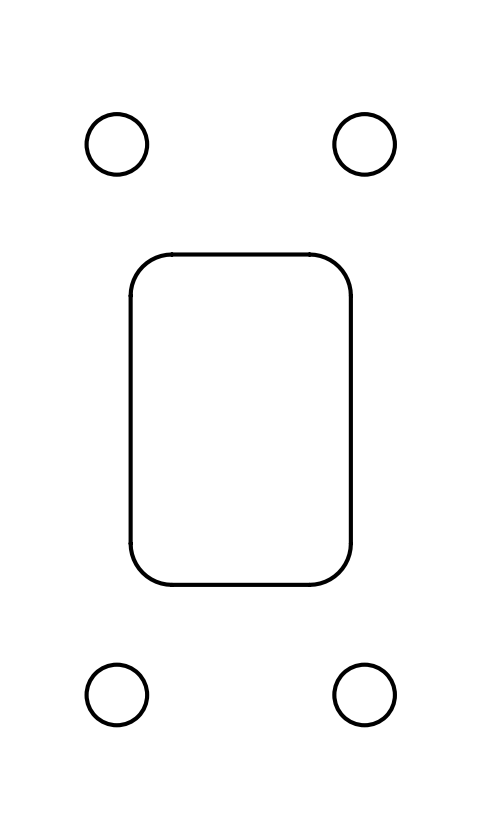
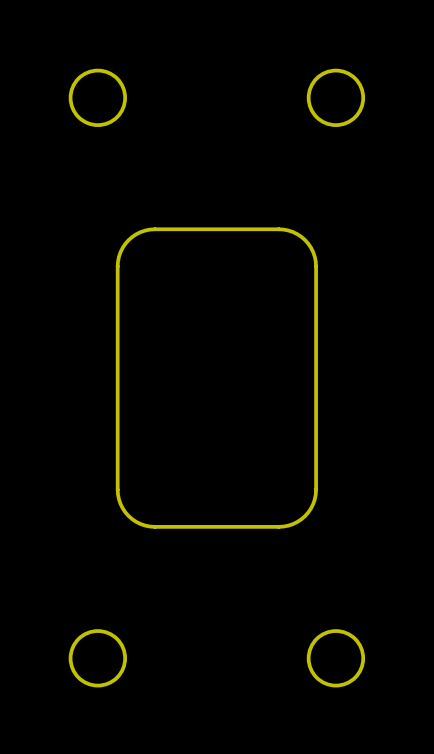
round board edge position: (116, 144) -> (97, 97)
round board edge position: (364, 144) -> (335, 97)
round board edge position: (116, 694) -> (97, 658)
round board edge position: (364, 694) -> (335, 658)

